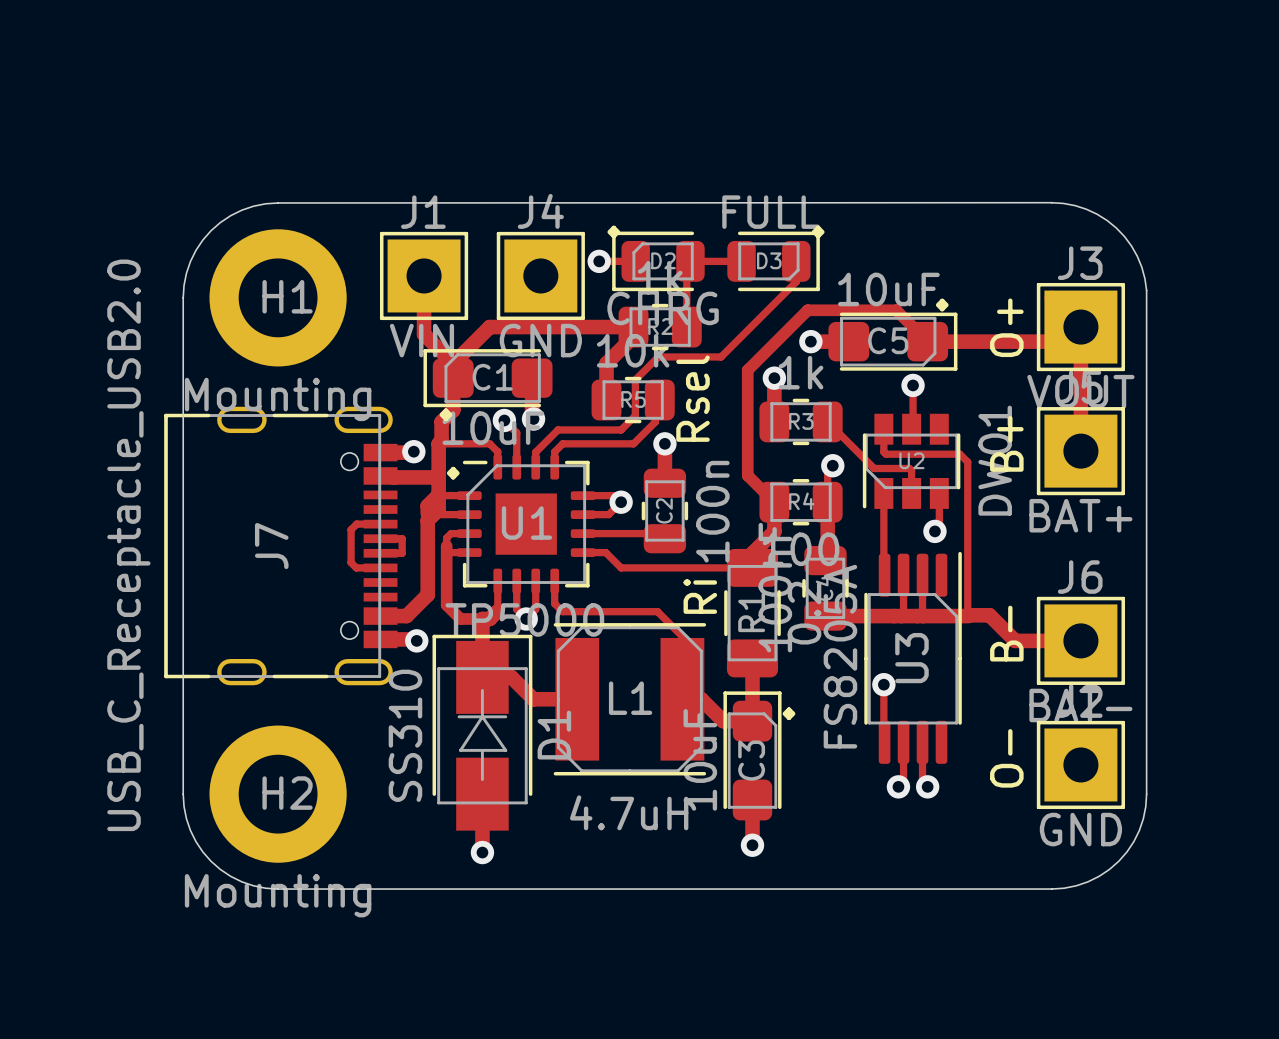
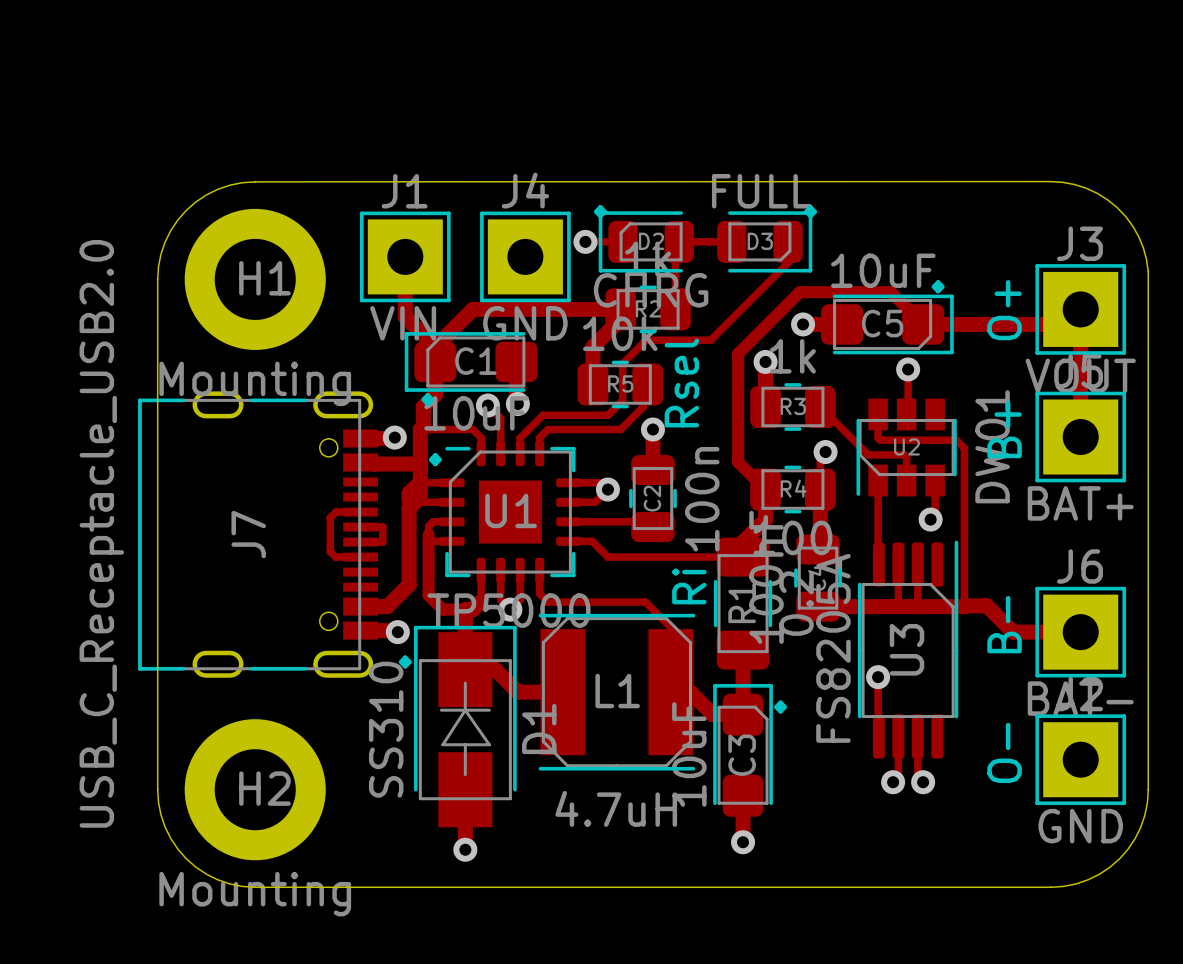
text: none -> . (405, 661)

